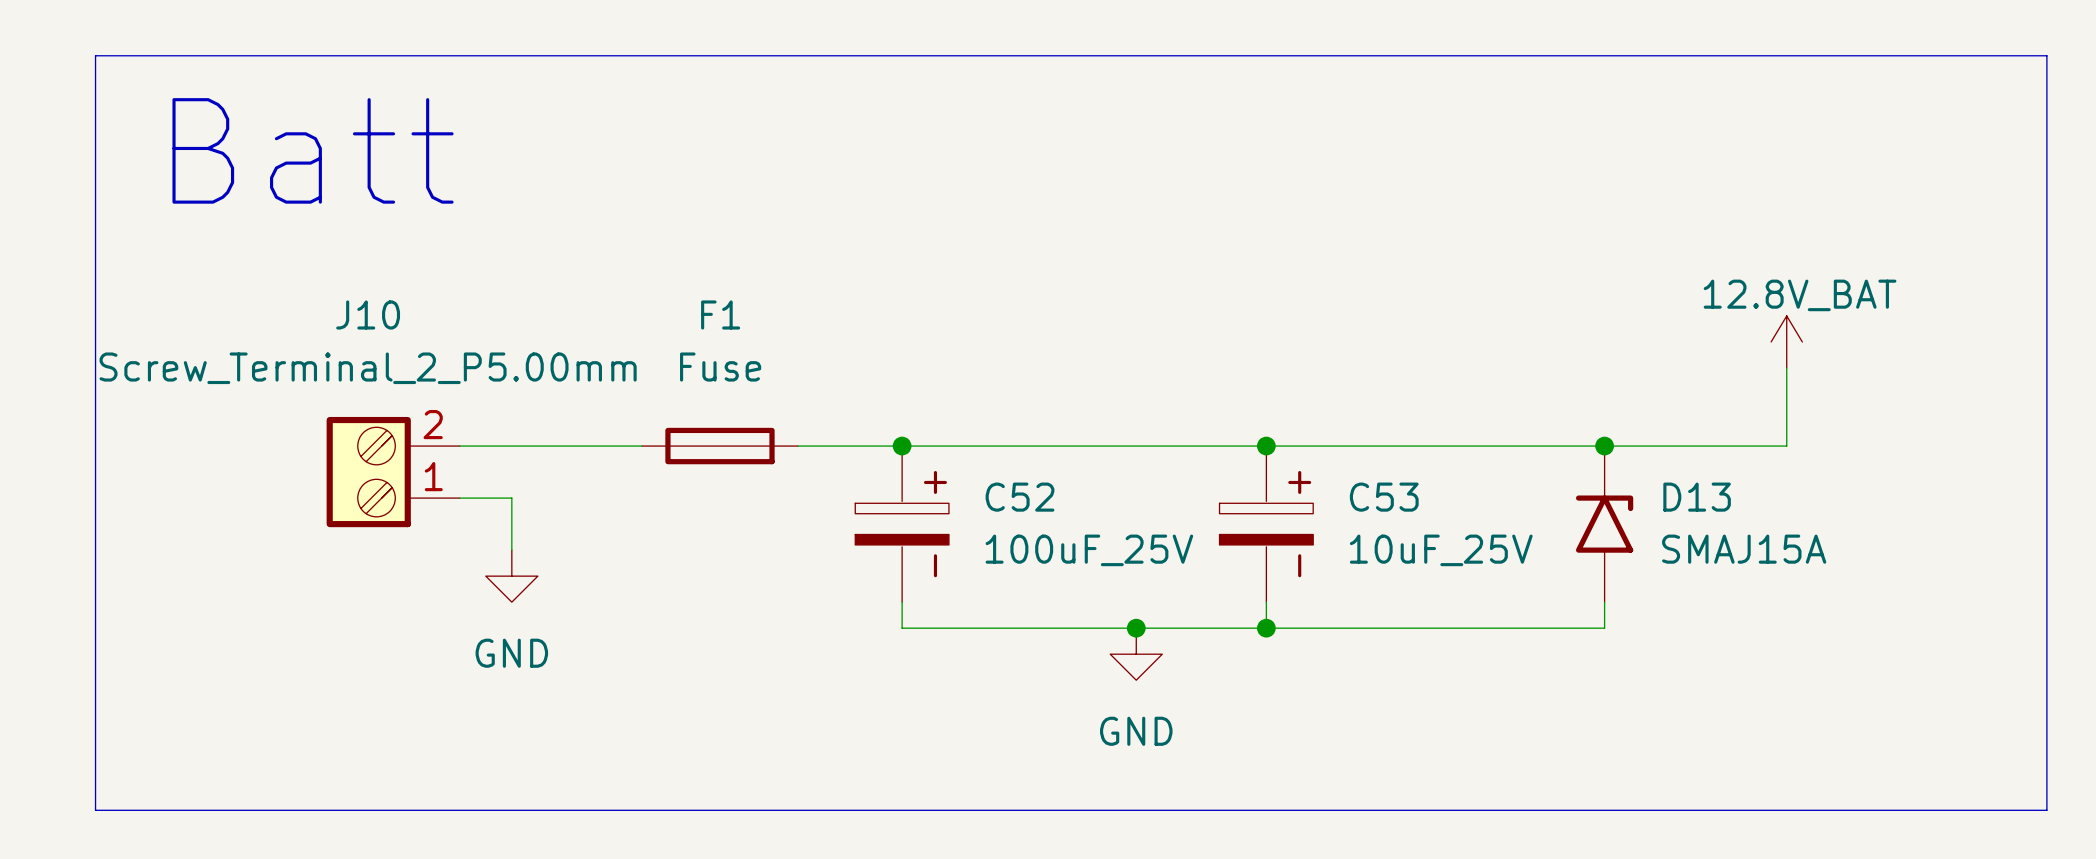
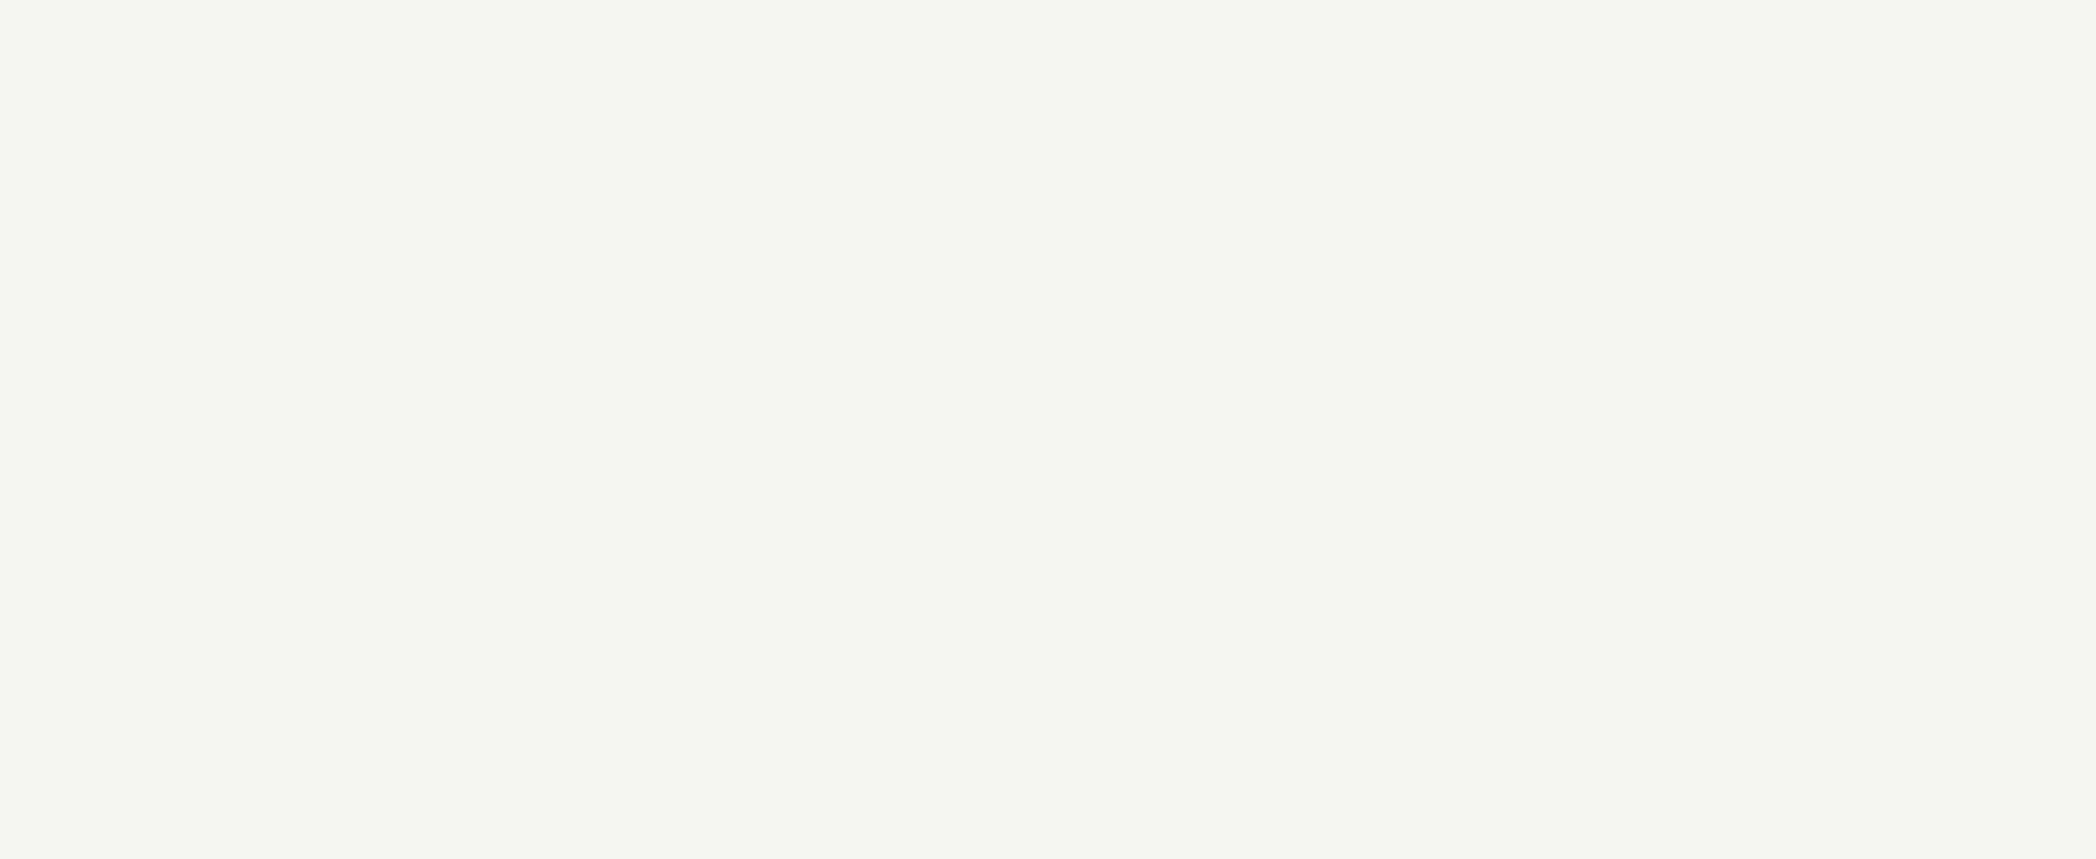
line: (95, 55) (2046, 55) (2046, 810) (95, 810) (95, 55) -> none
text: Batt (313, 150) -> none
power symbol: 12.8V_BAT (1786, 341) -> none
wire: (1786, 367) (1786, 446) (798, 446) -> none
wire: (459, 446) (641, 446) -> none
F1: Fuse (719, 446) -> none
junction: (902, 446) -> none
junction: (1266, 446) -> none
junction: (1604, 446) -> none
J10: Screw_Terminal_2_P5.00mm (393, 472) -> none
wire: (459, 498) (511, 498) (511, 550) -> none
C52: 100uF_25V (902, 524) -> none
C53: 10uF_25V (1266, 524) -> none
D13: SMAJ15A (1604, 524) -> none
power symbol: GND (511, 576) -> none
wire: (902, 602) (902, 628) (1604, 628) (1604, 602) -> none
wire: (1266, 602) (1266, 628) -> none
junction: (1136, 628) -> none
junction: (1266, 628) -> none
power symbol: GND (1136, 654) -> none

